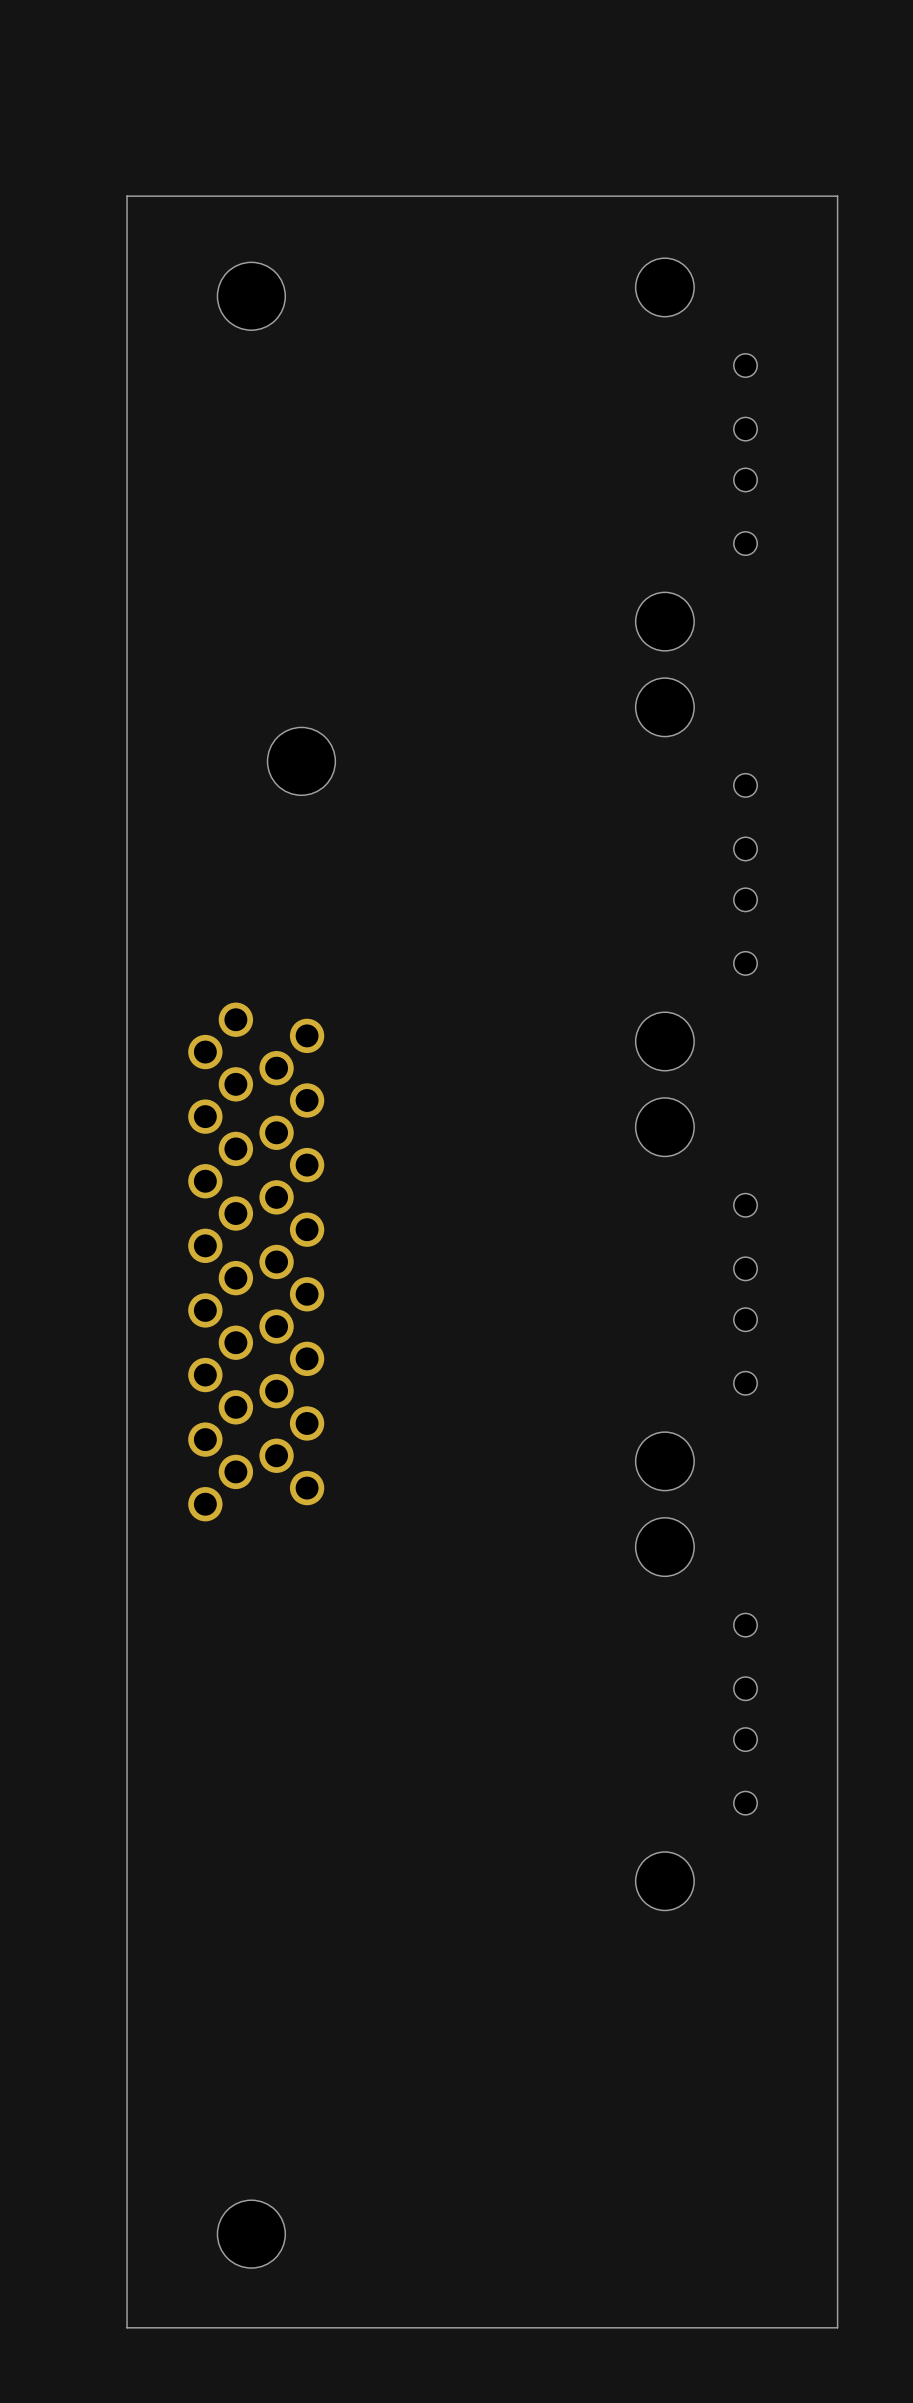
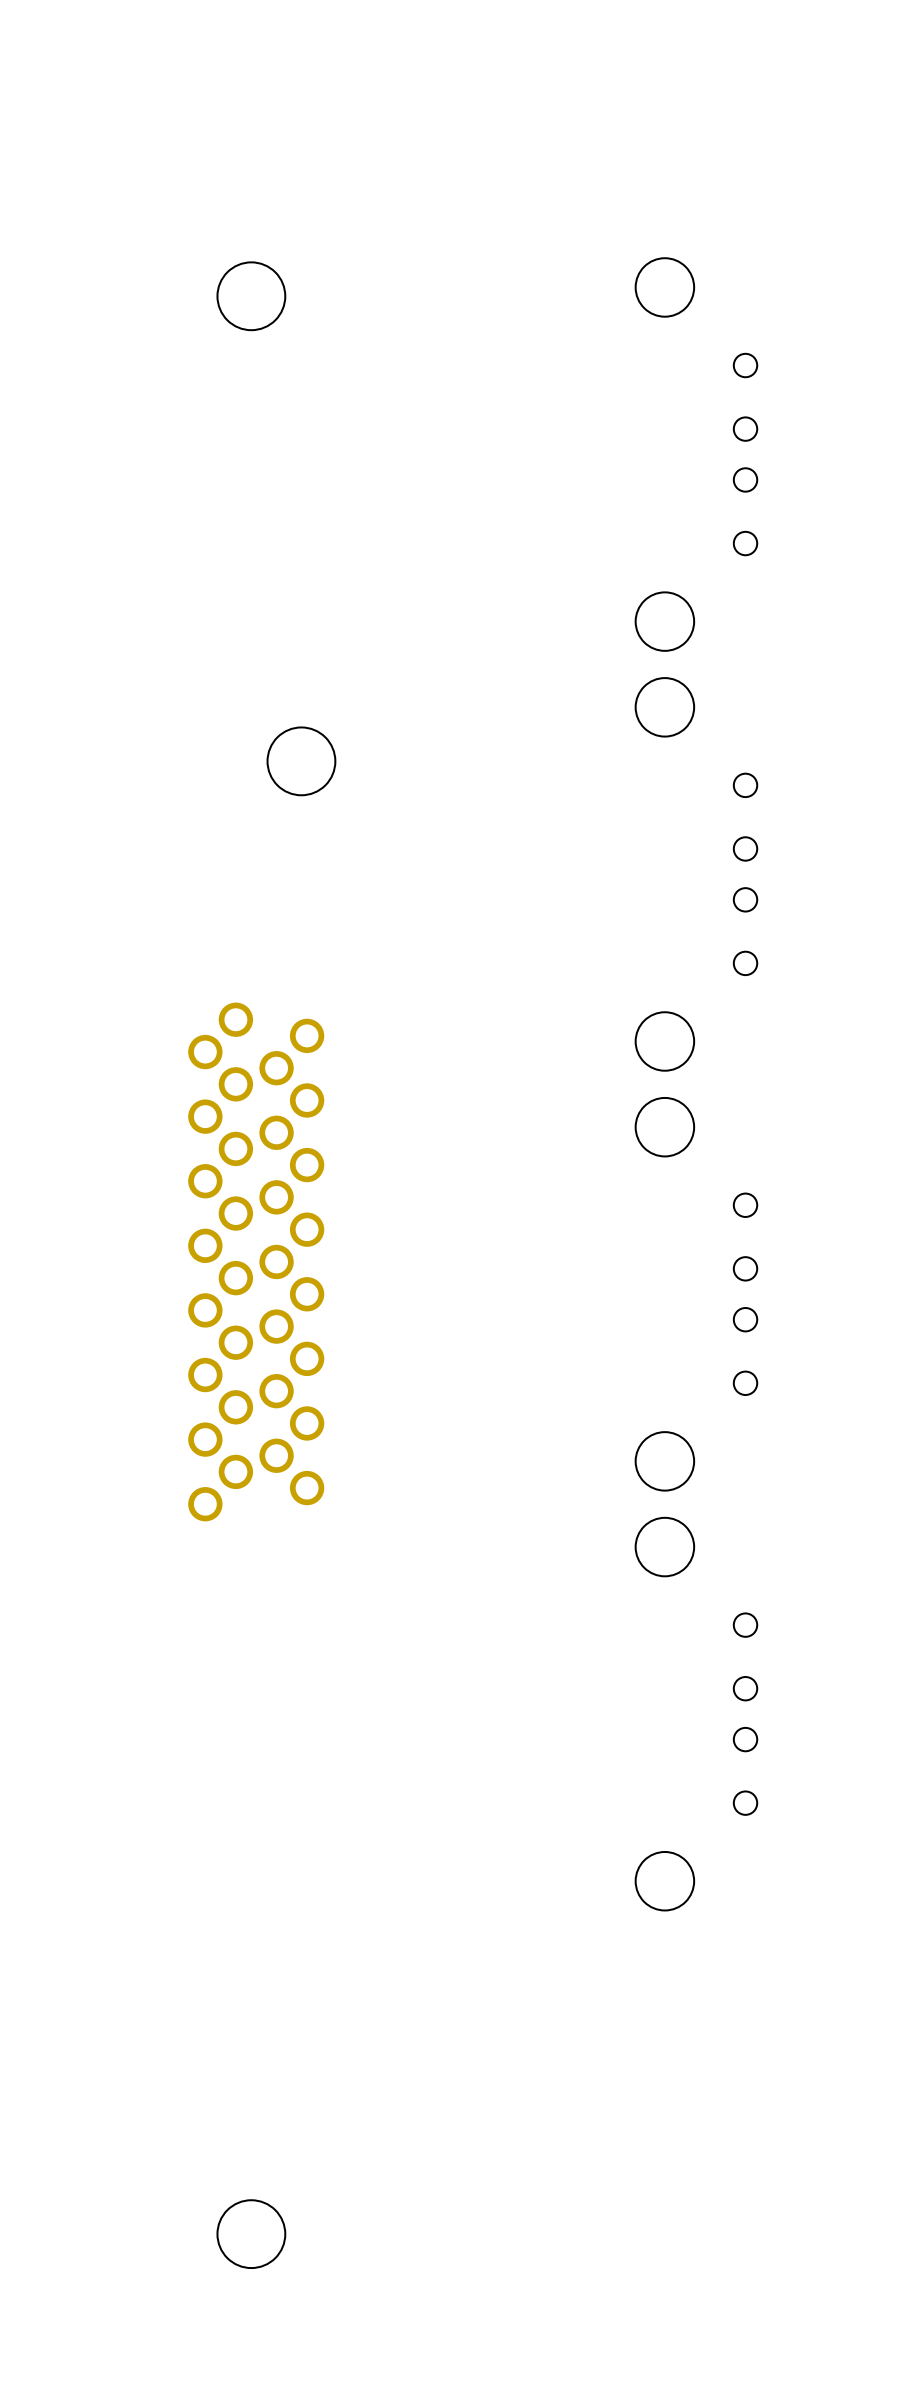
board edge: (837, 196) (837, 2327) (127, 2327) (127, 196) (837, 196) -> none

